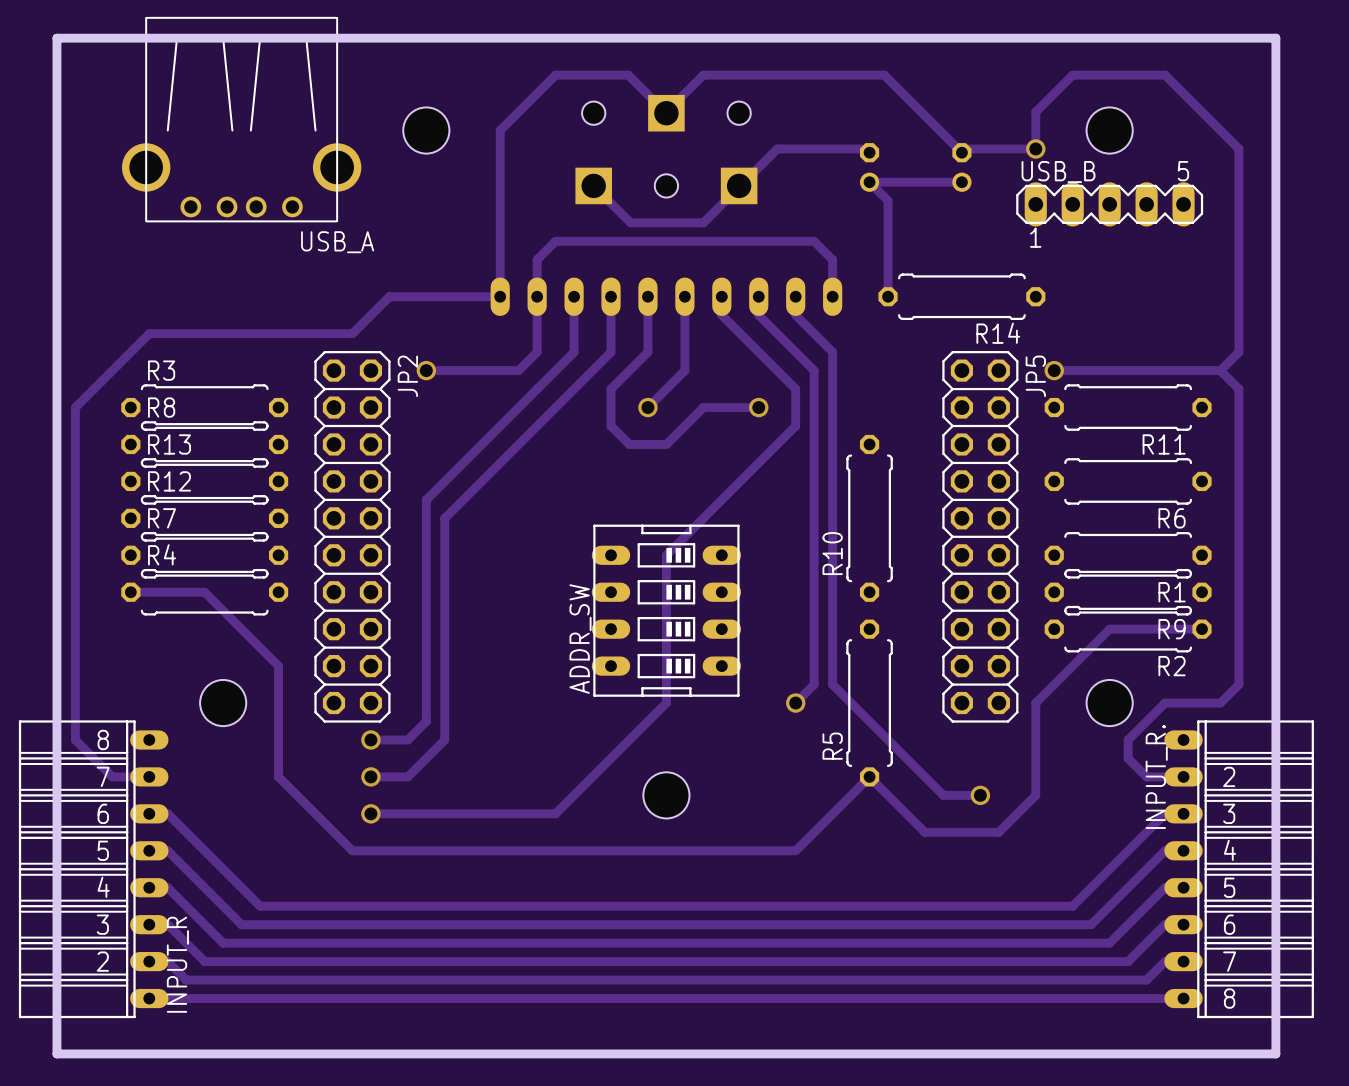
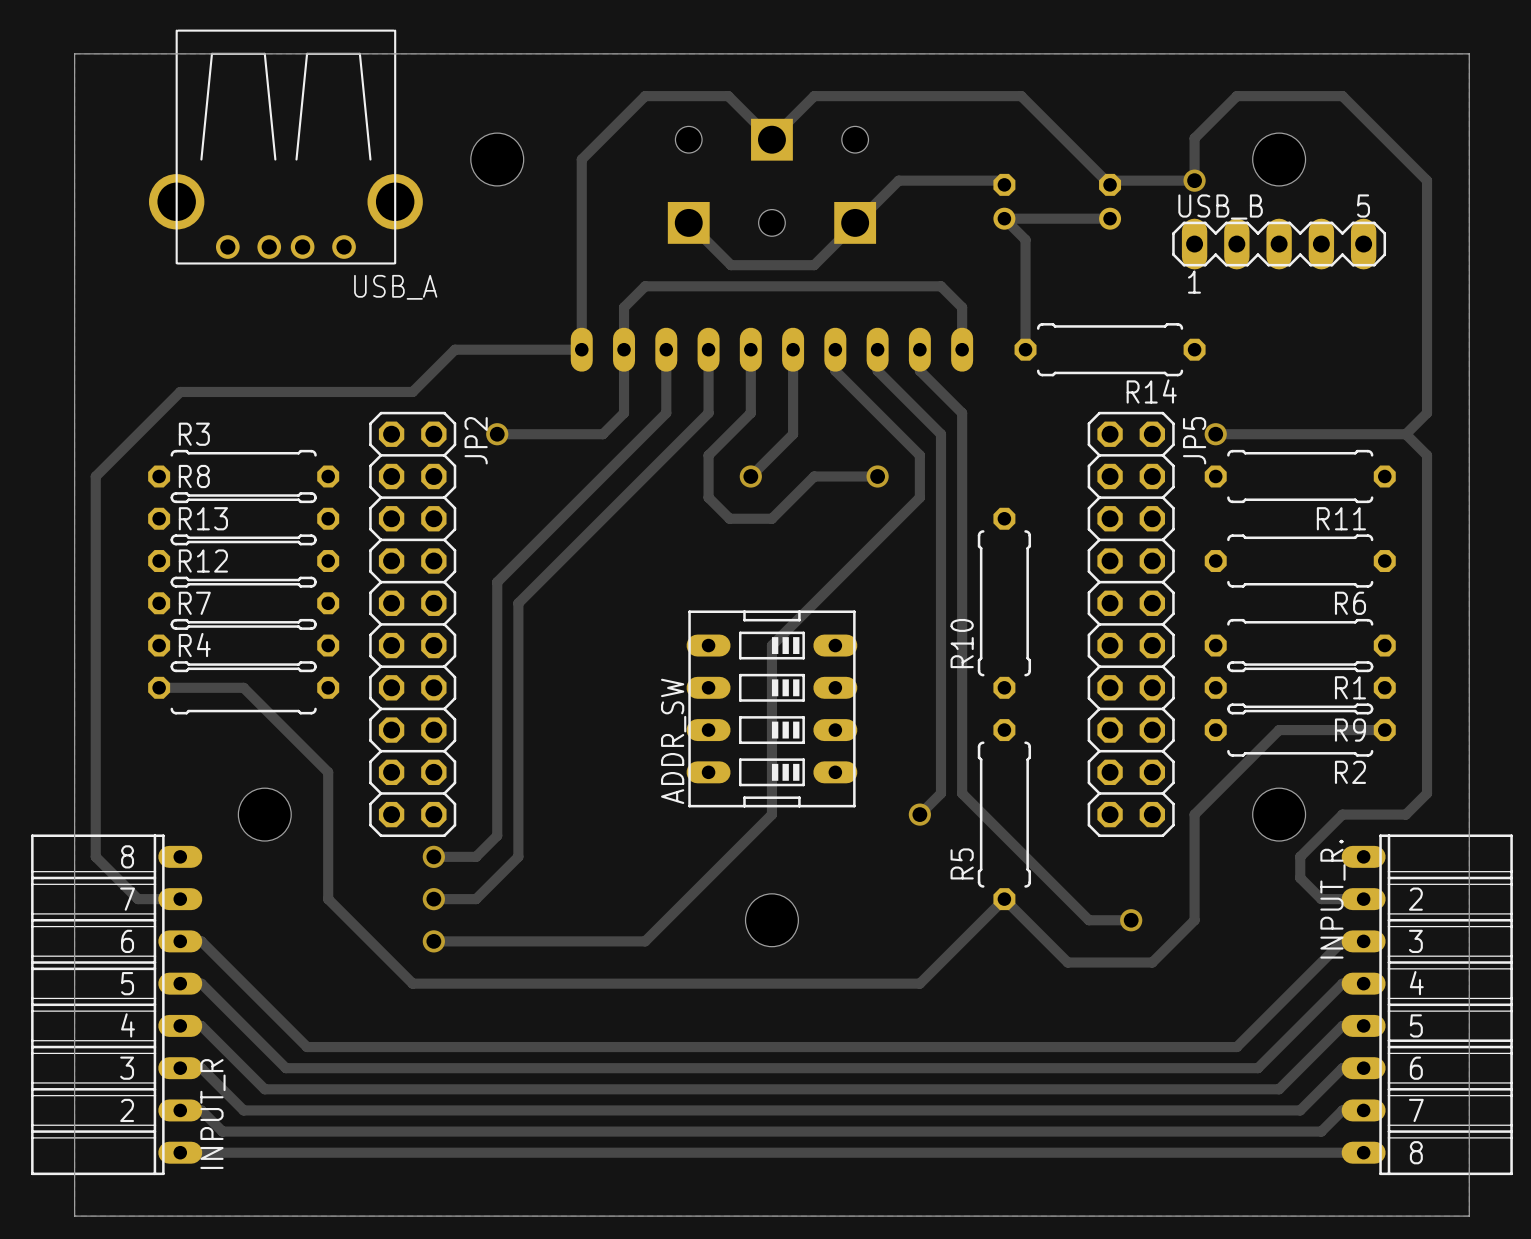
board edge width: thick (1275, 38) (56, 38) (56, 1053) (1275, 1053) (1275, 38) -> thin (1469, 53) (74, 53) (74, 1216) (1469, 1216) (1469, 53)

